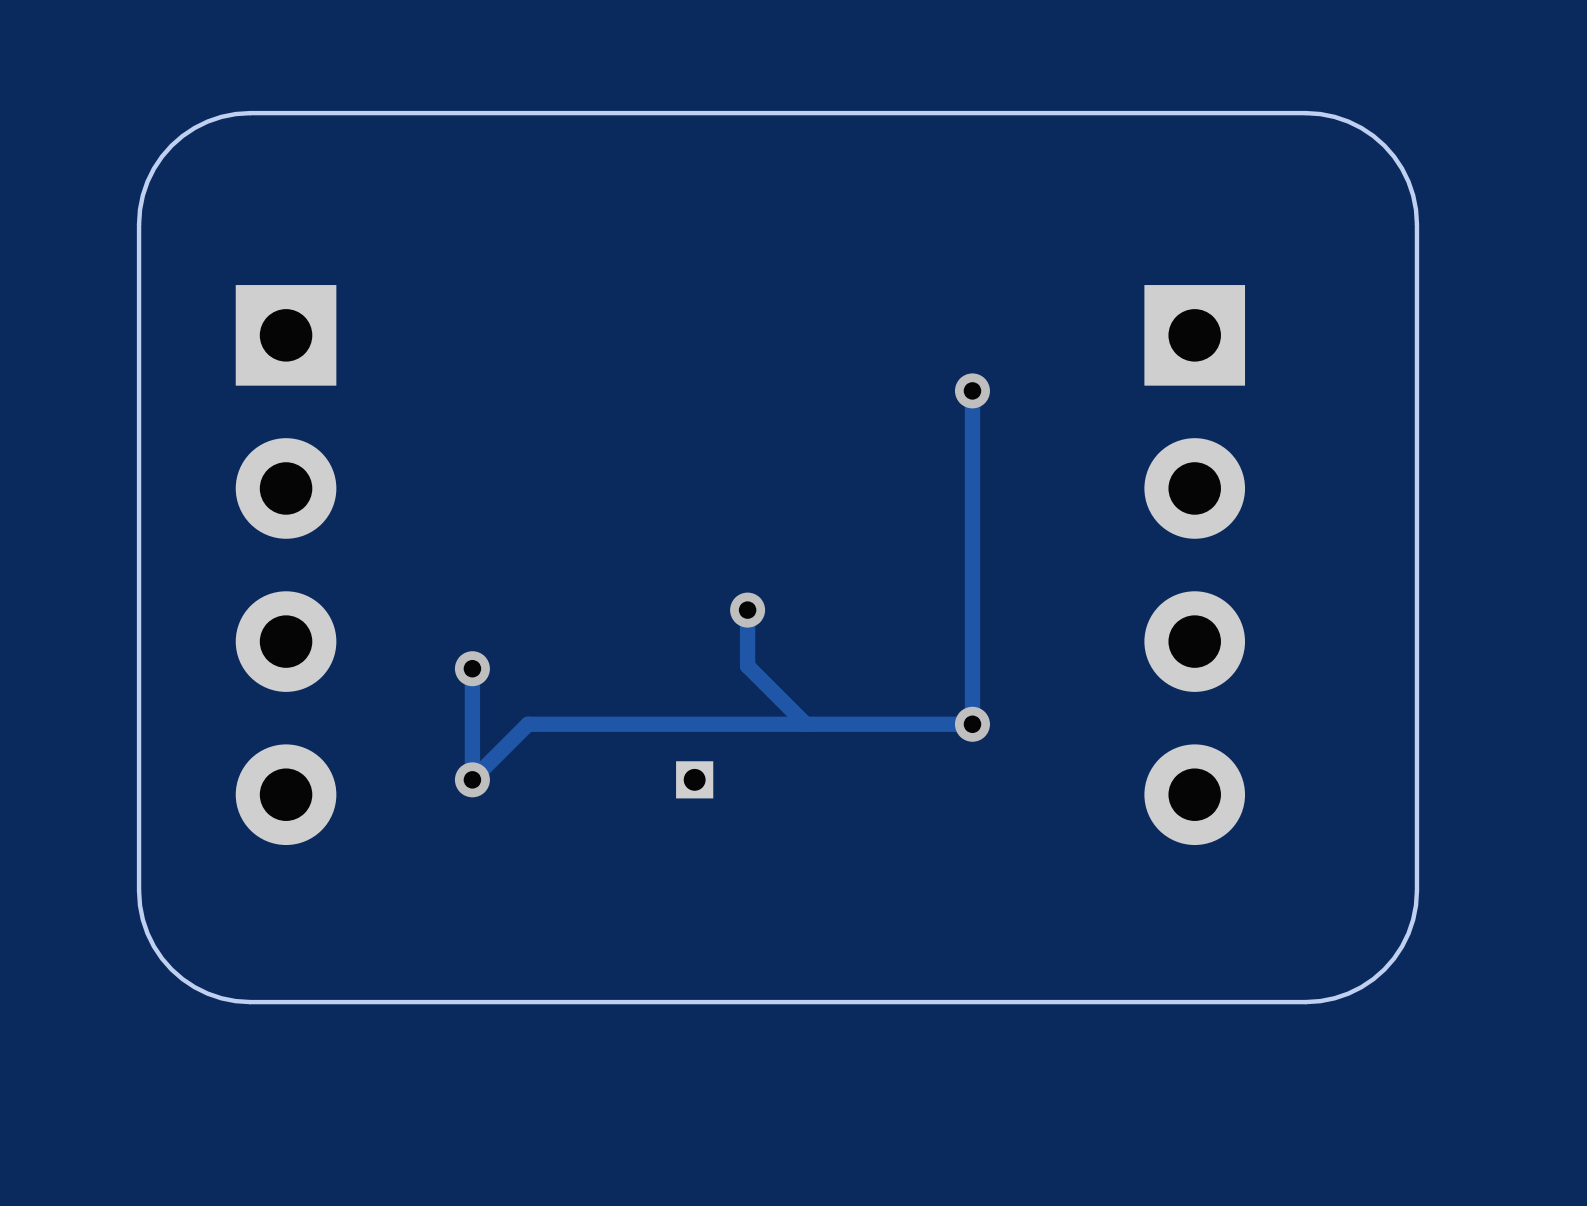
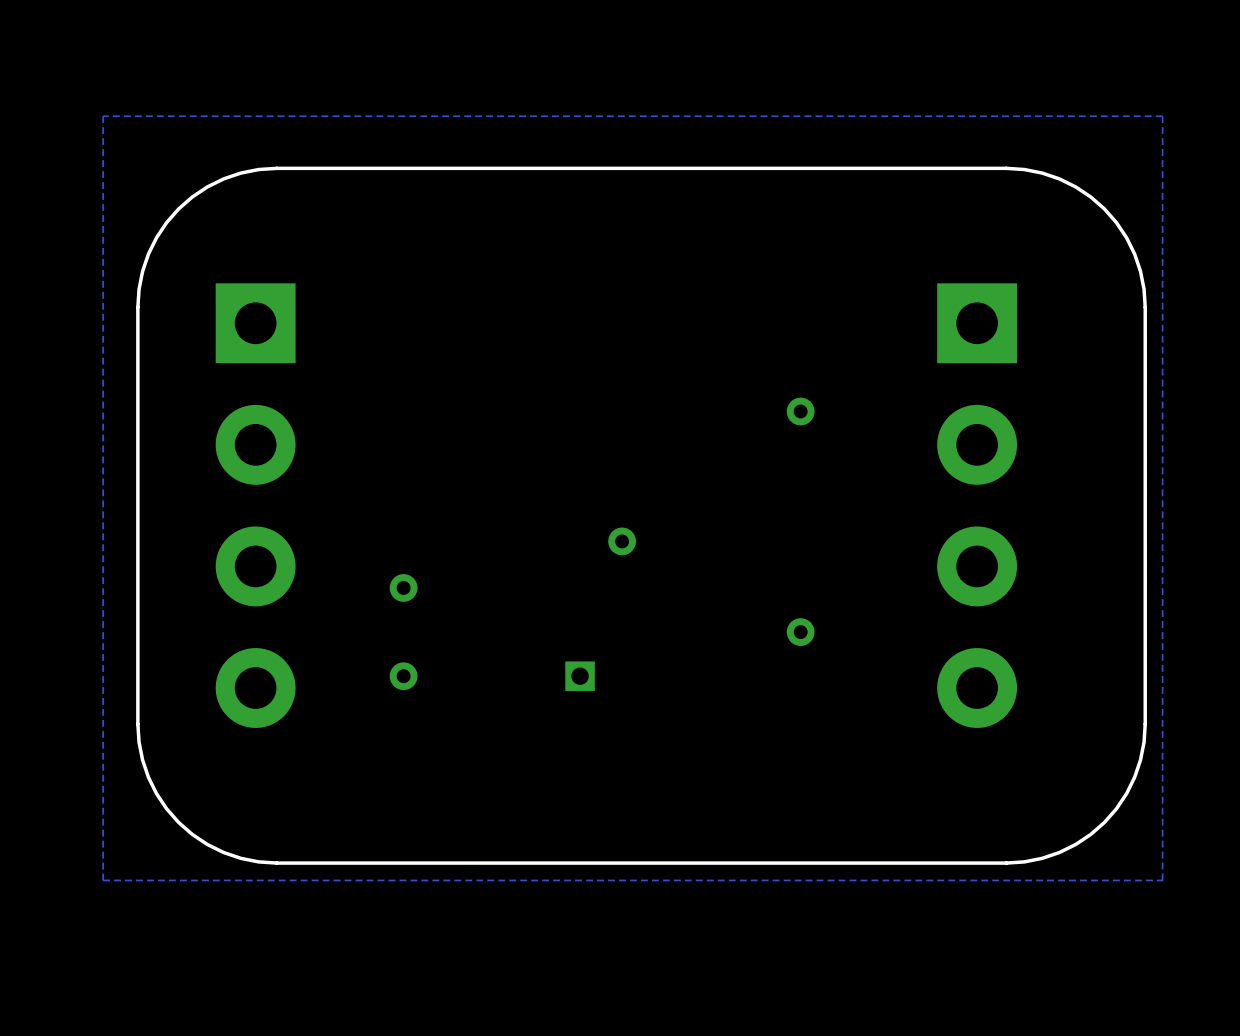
zone outline: none -> (1162, 116) (1162, 880) (103, 880) (103, 116) (1162, 116)
board edge: (1305, 113) (250, 113) (235, 114) (207, 121) (182, 136) (162, 156) (153, 168) (142, 195) (139, 224) (139, 890) (140, 905) (147, 933) (162, 958) (182, 979) (194, 987) (221, 998) (250, 1002) (1305, 1002) (1320, 1001) (1348, 993) (1373, 979) (1384, 969) (1402, 946) (1413, 919) (1416, 890) (1416, 209) (1408, 181) (1402, 168) (1384, 145) (1373, 136) (1348, 121) (1334, 116) (1305, 113) -> (1006, 168) (1042, 173) (1059, 178) (1075, 186) (1104, 209) (1126, 237) (1134, 254) (1144, 289) (1144, 742) (1140, 760) (1126, 793) (1116, 808) (1090, 834) (1059, 852) (1042, 858) (1006, 863) (276, 863) (258, 861) (223, 852) (192, 834) (166, 808) (148, 777) (142, 760) (137, 724) (137, 307) (139, 289) (148, 254) (166, 222) (192, 197) (223, 178) (258, 169) (276, 168) (1006, 168)
track: (972, 390) (972, 724) (527, 724) (472, 779) (472, 668) -> none
via position: (972, 390) -> (800, 411)
track: (747, 610) (747, 666) (805, 724) -> none

